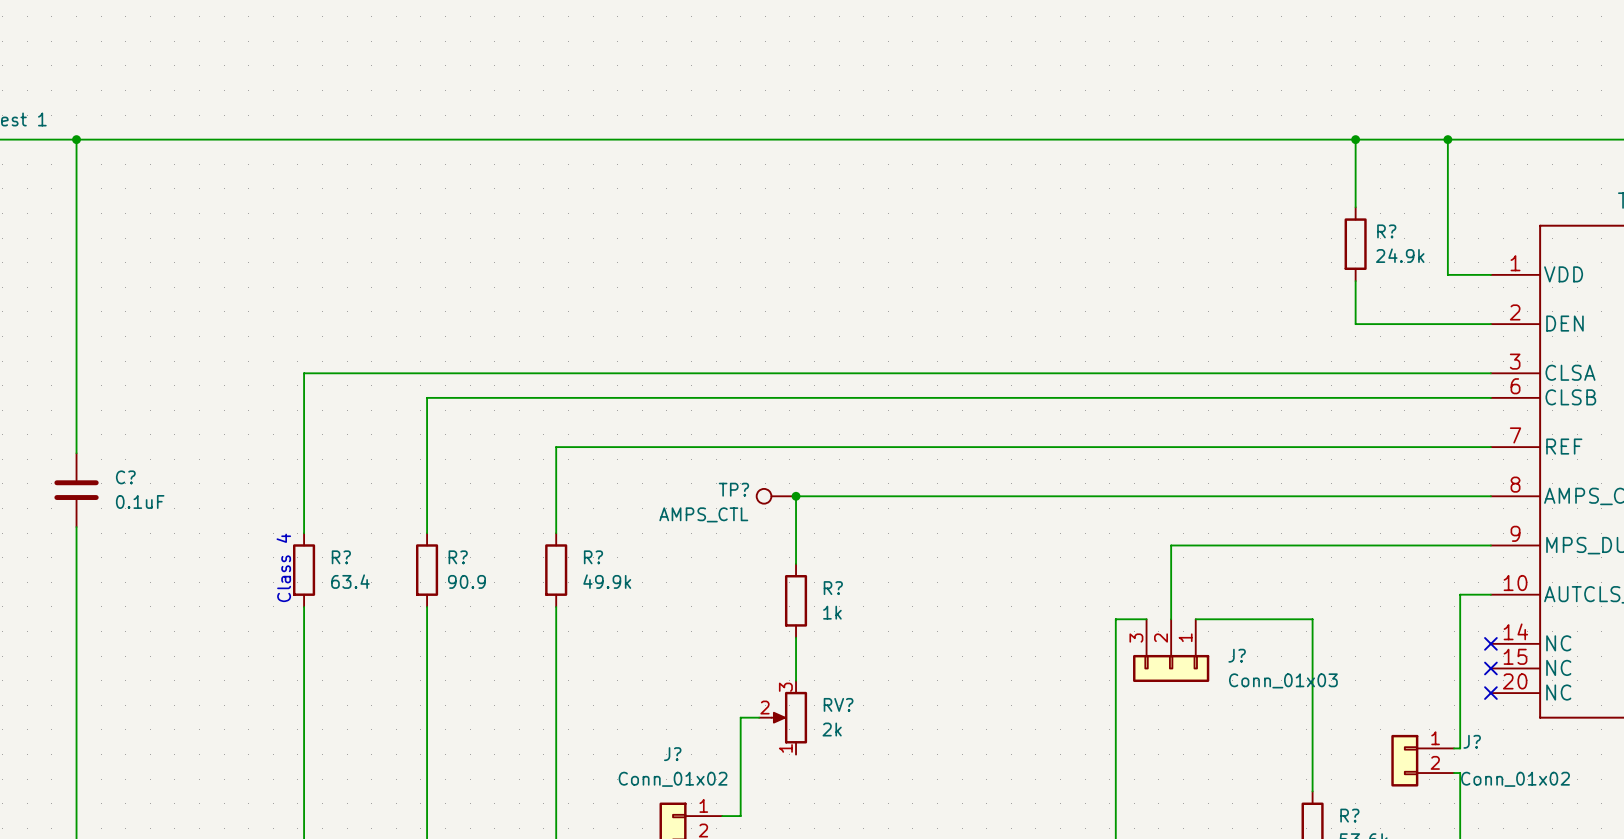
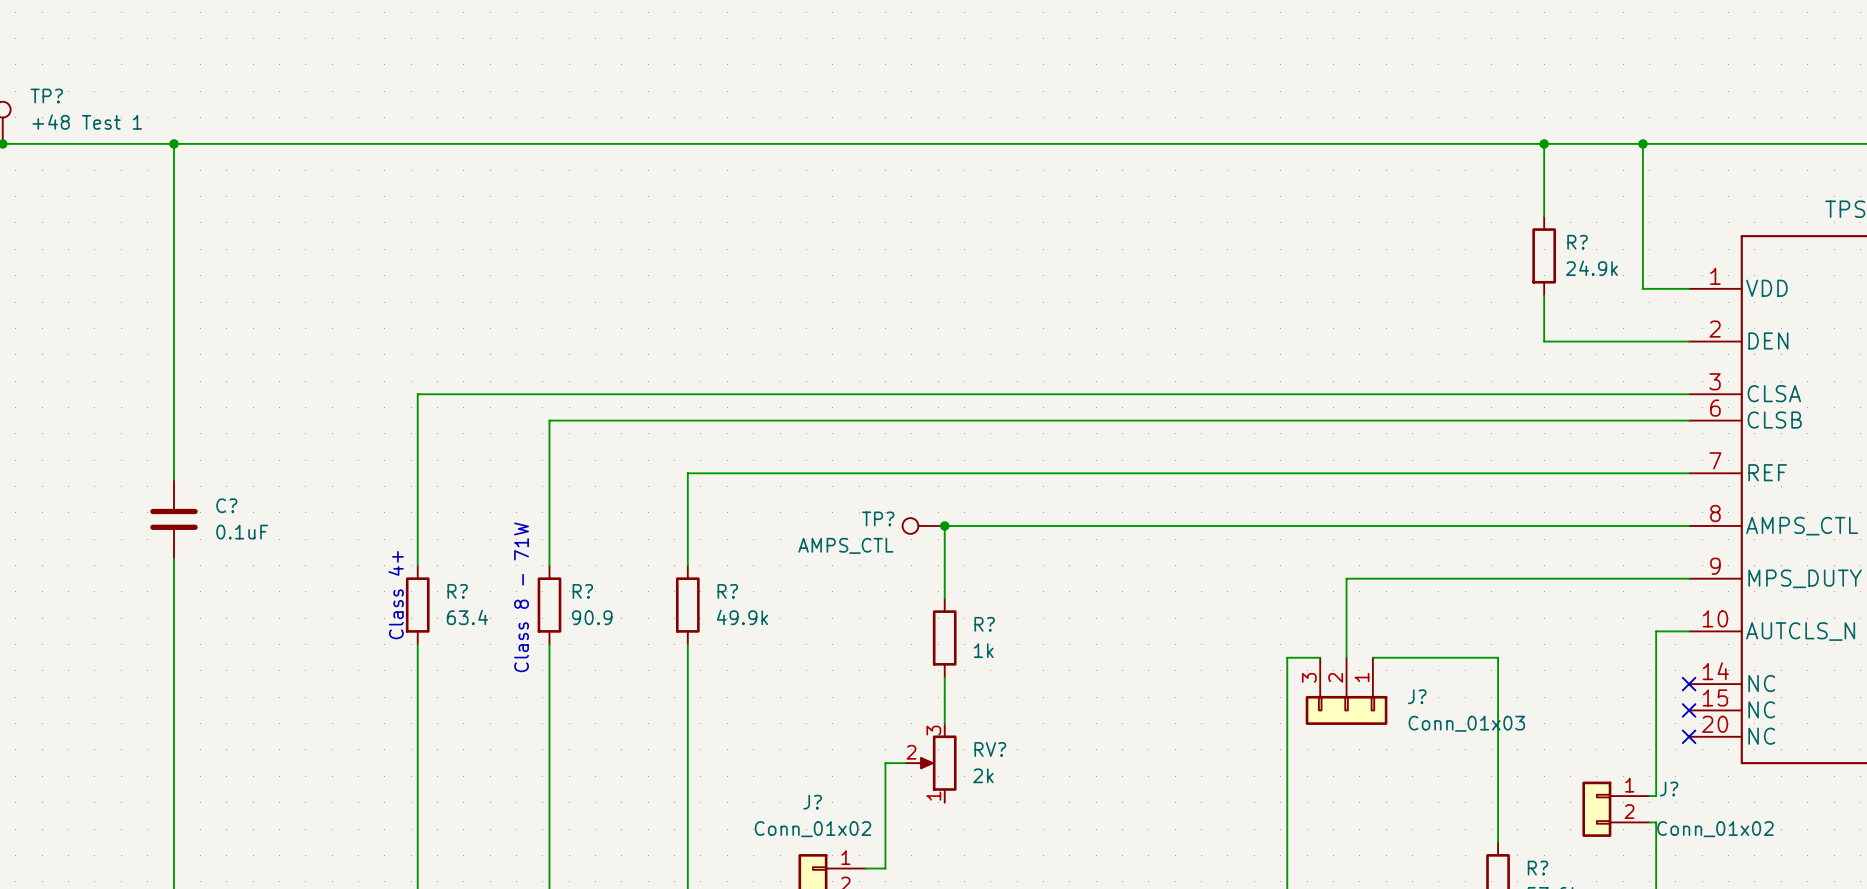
text: none -> Class 8 - 71W (521, 597)
text: Class 4 (283, 567) -> Class 4+ (396, 595)

